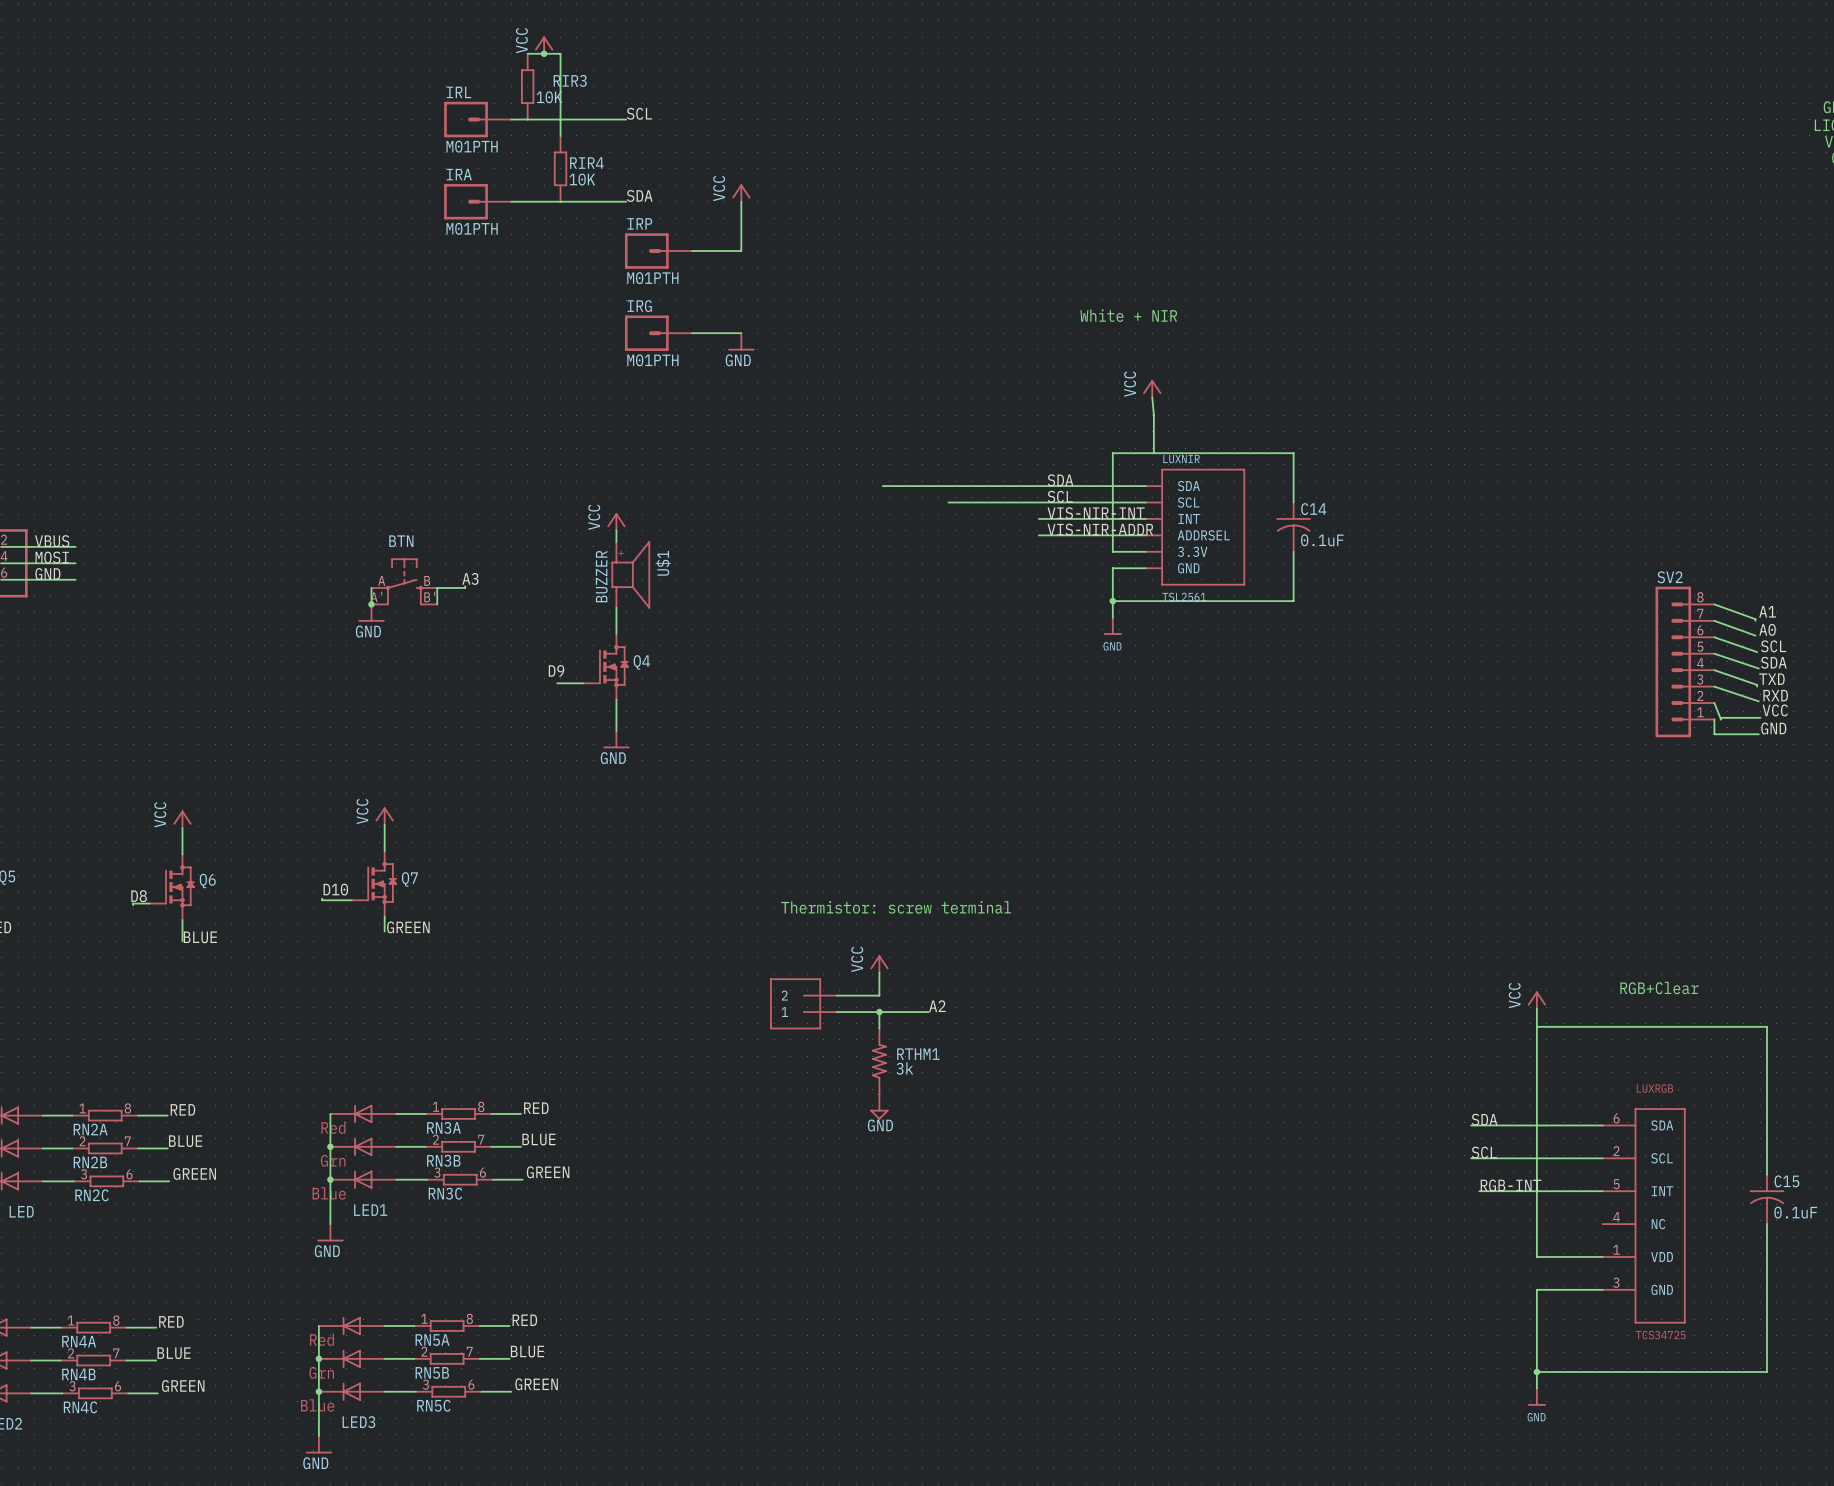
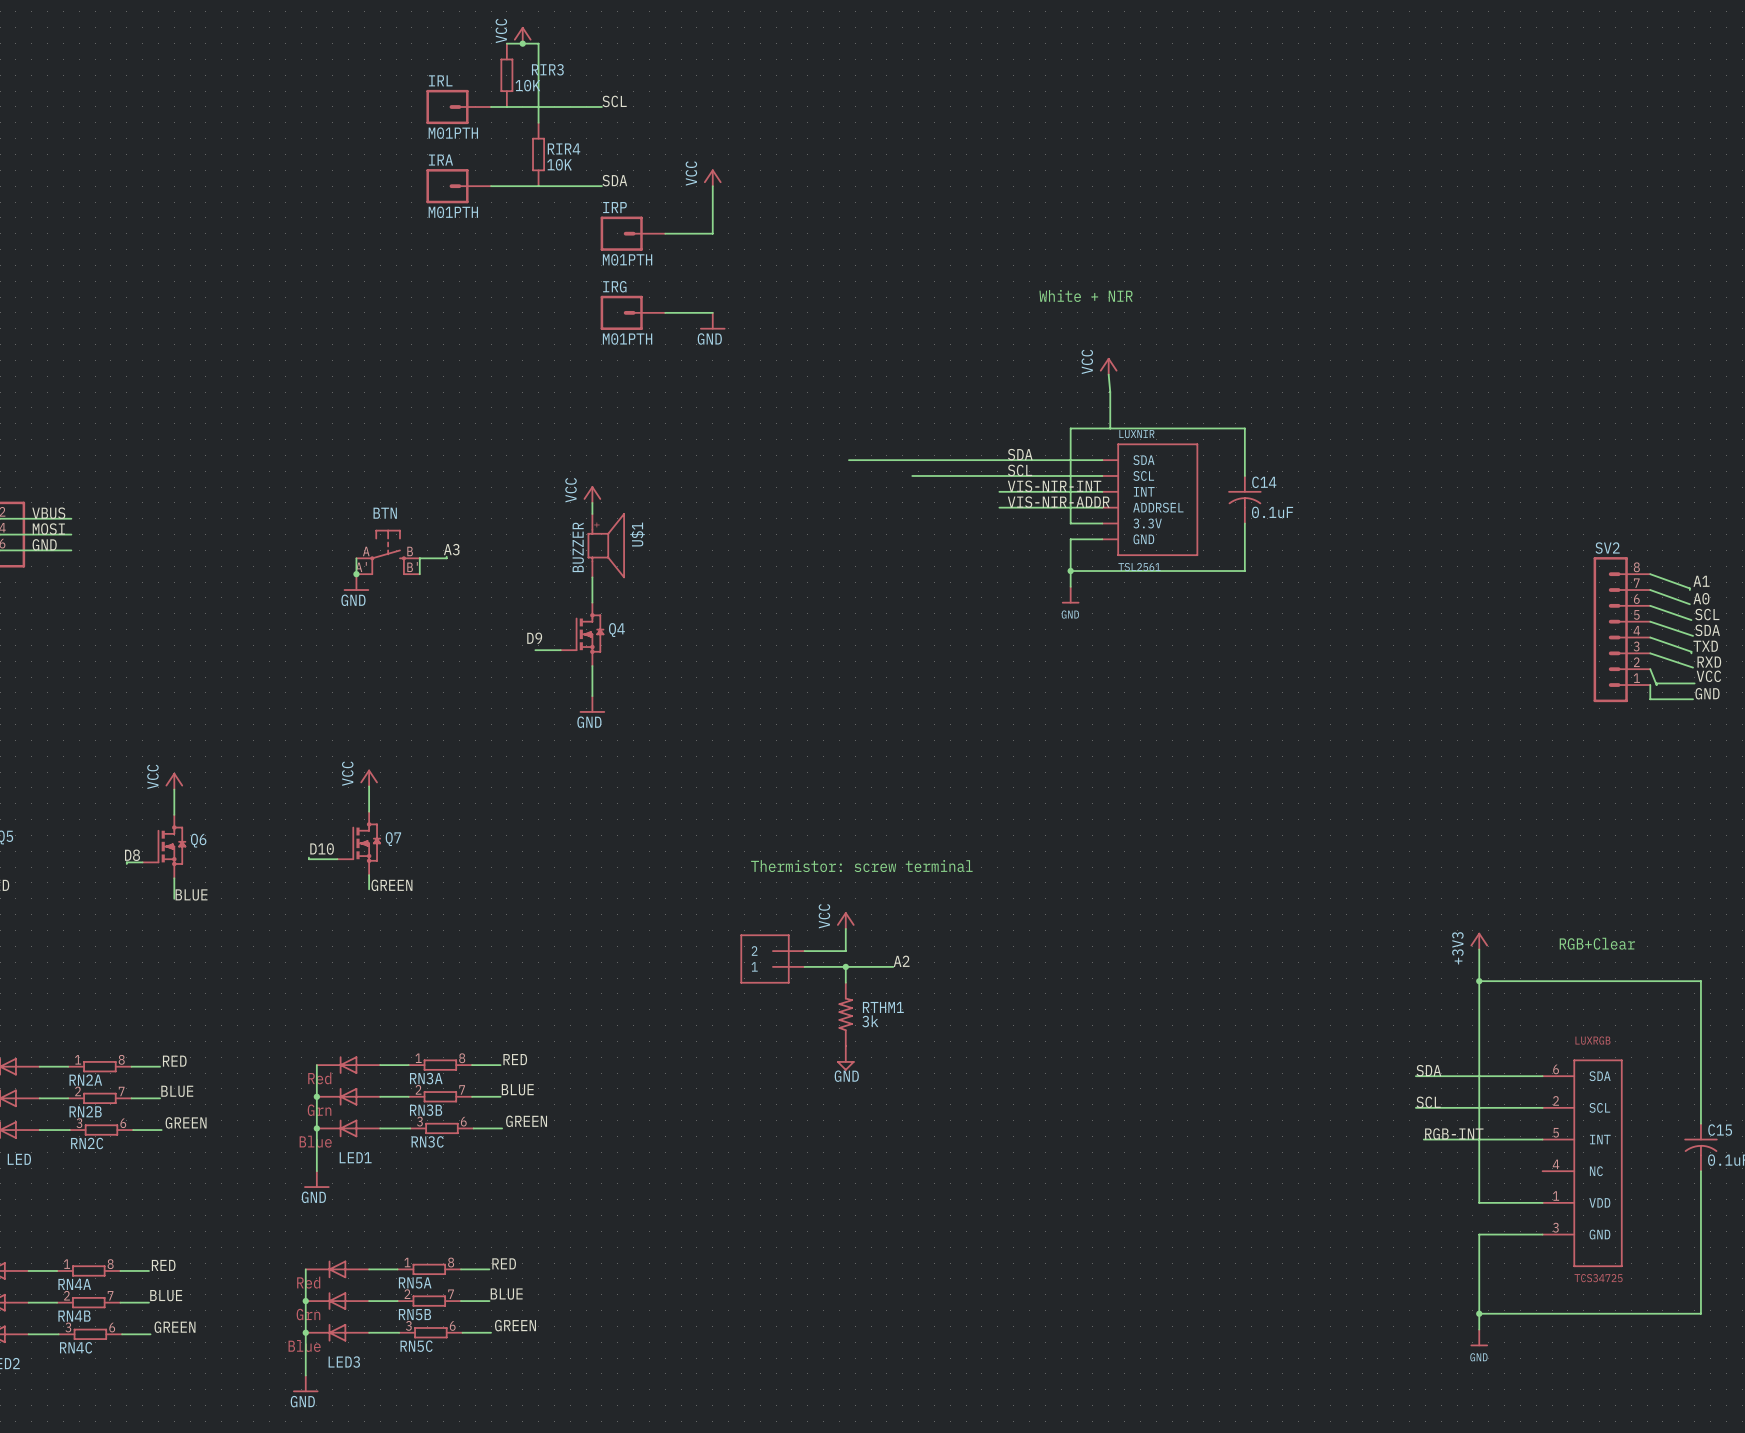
power symbol: none -> +3V3 (1479, 941)
power symbol: VCC (1536, 1000) -> none
junction: none -> (1479, 981)

